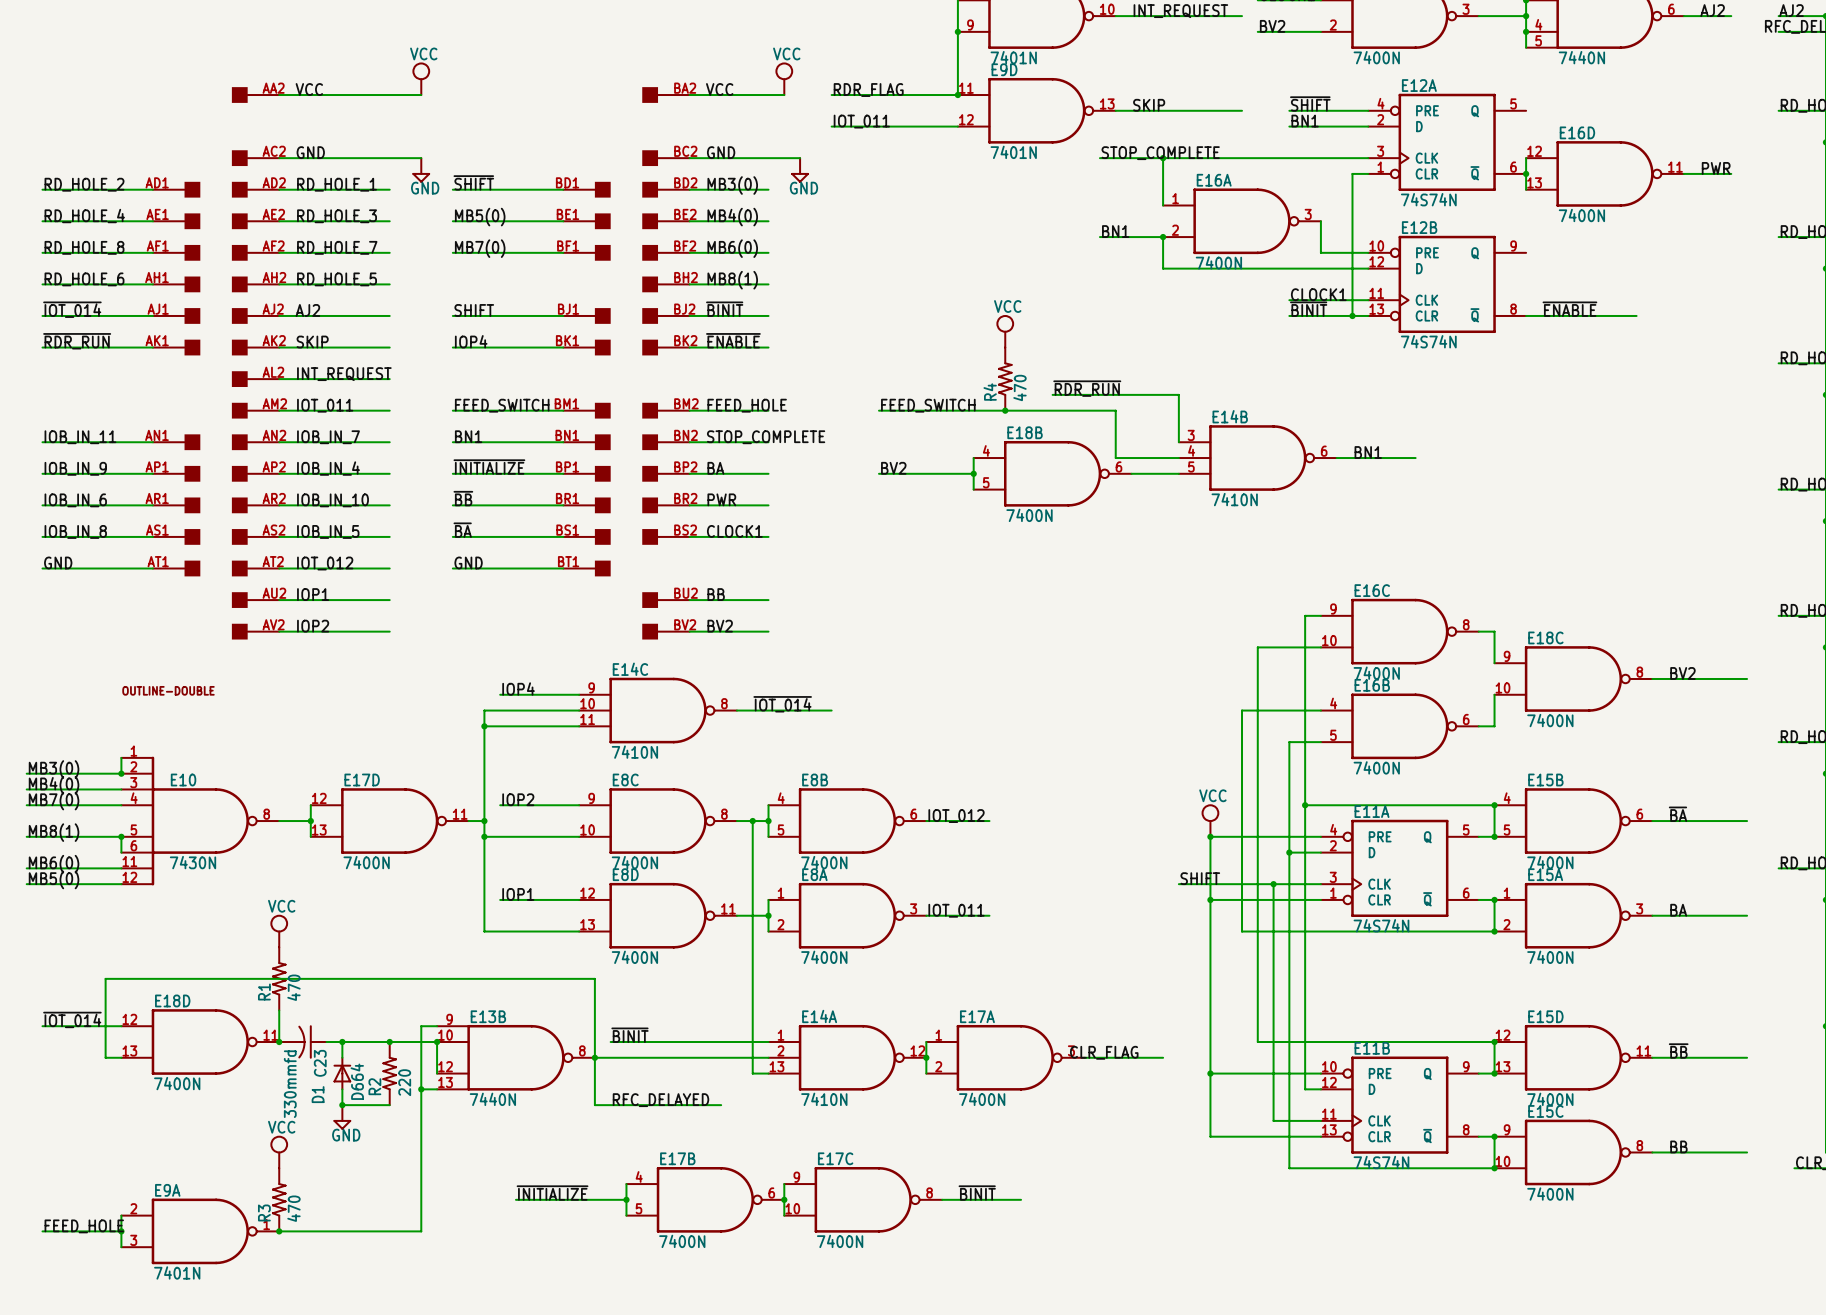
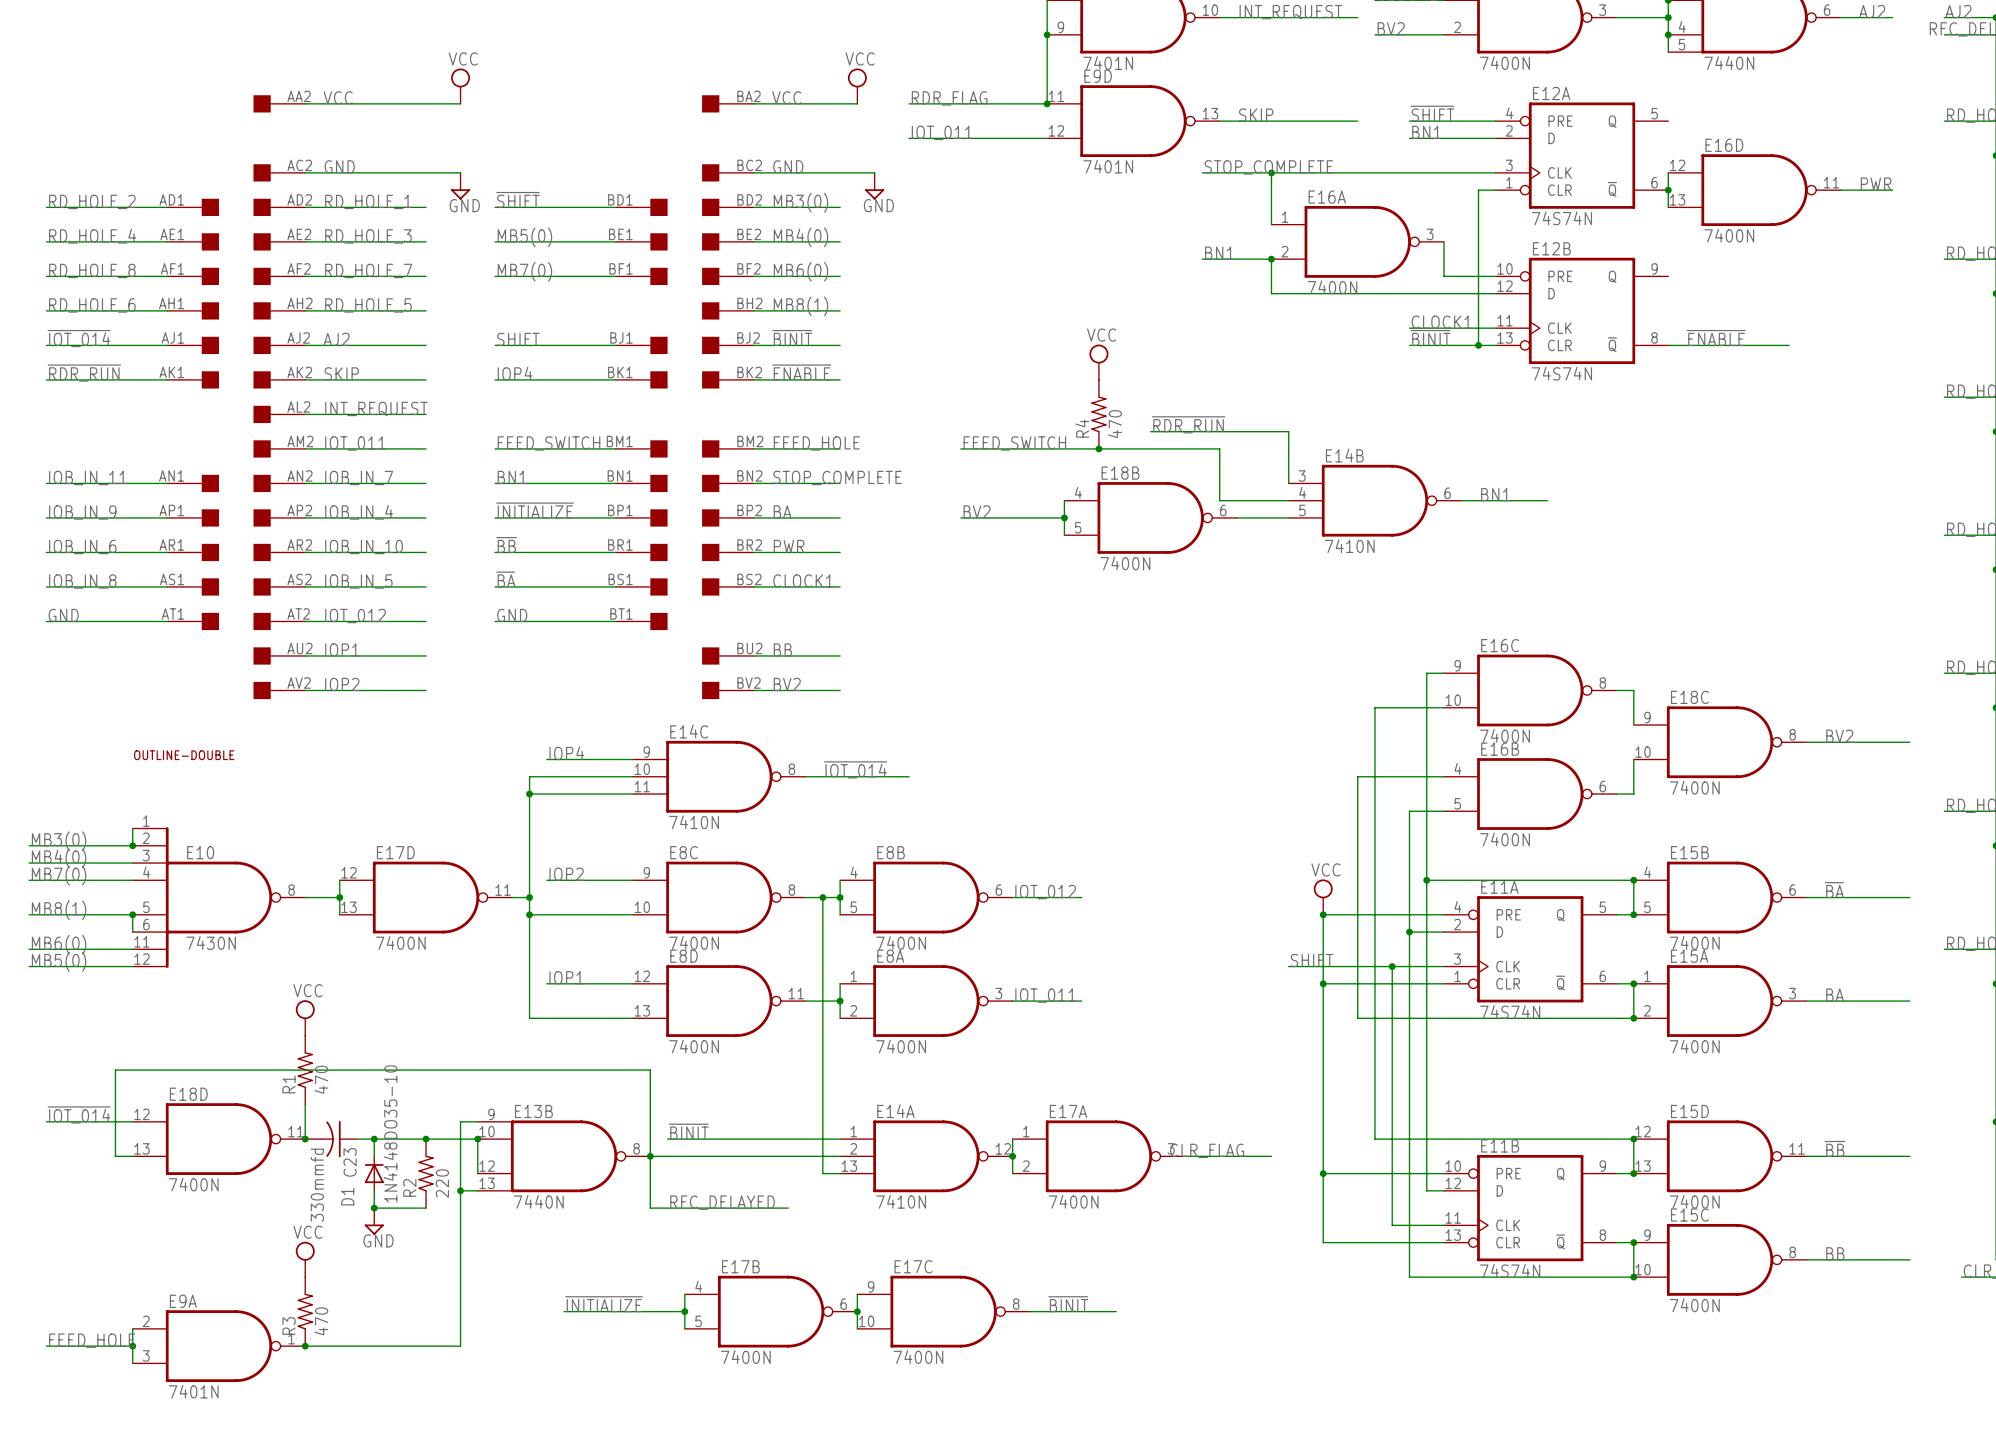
D1 value: D664 (357, 1081) -> 1N4148DO35-10 (390, 1133)

